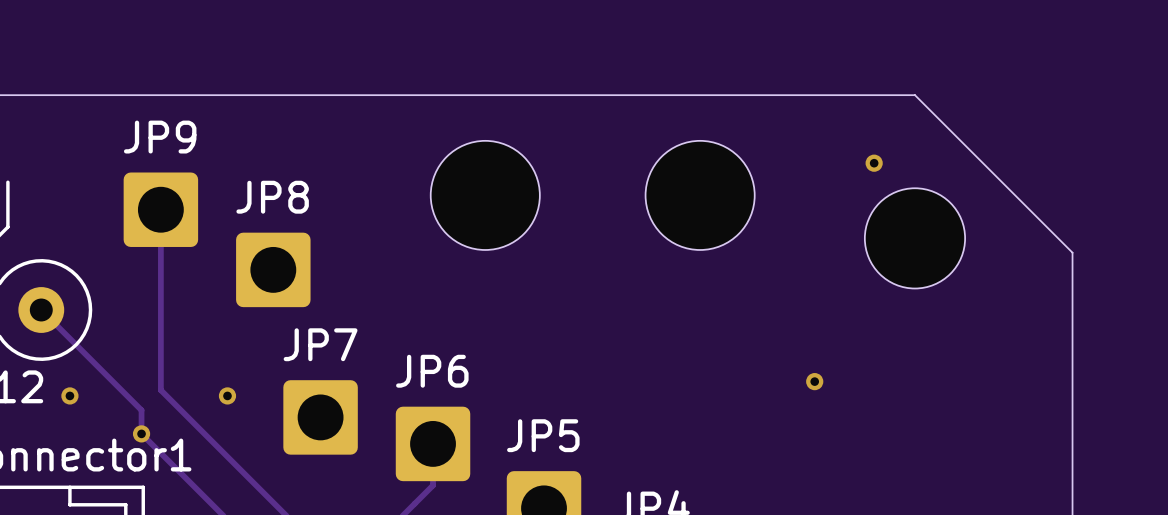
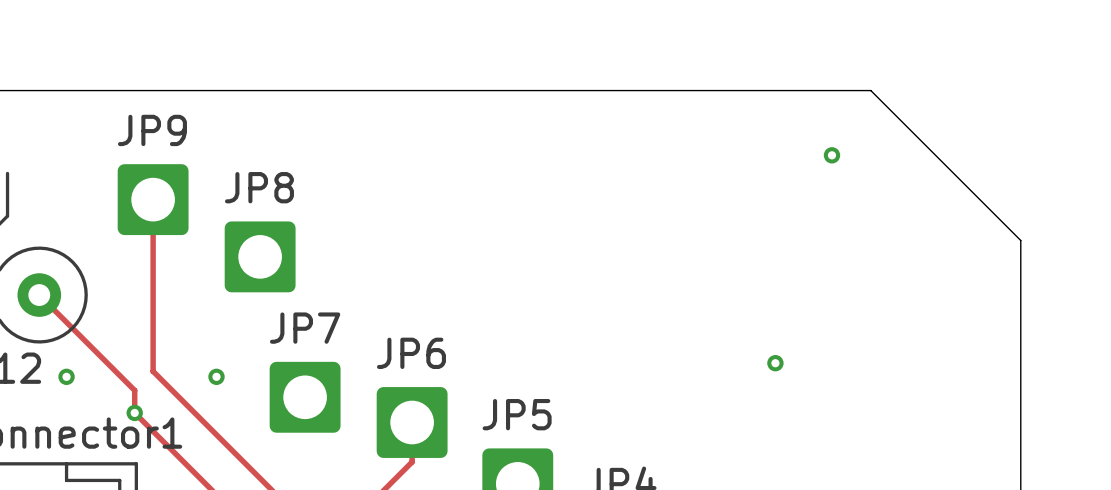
part: (485, 195) -> none
part: (700, 195) -> none
part: (914, 238) -> none

